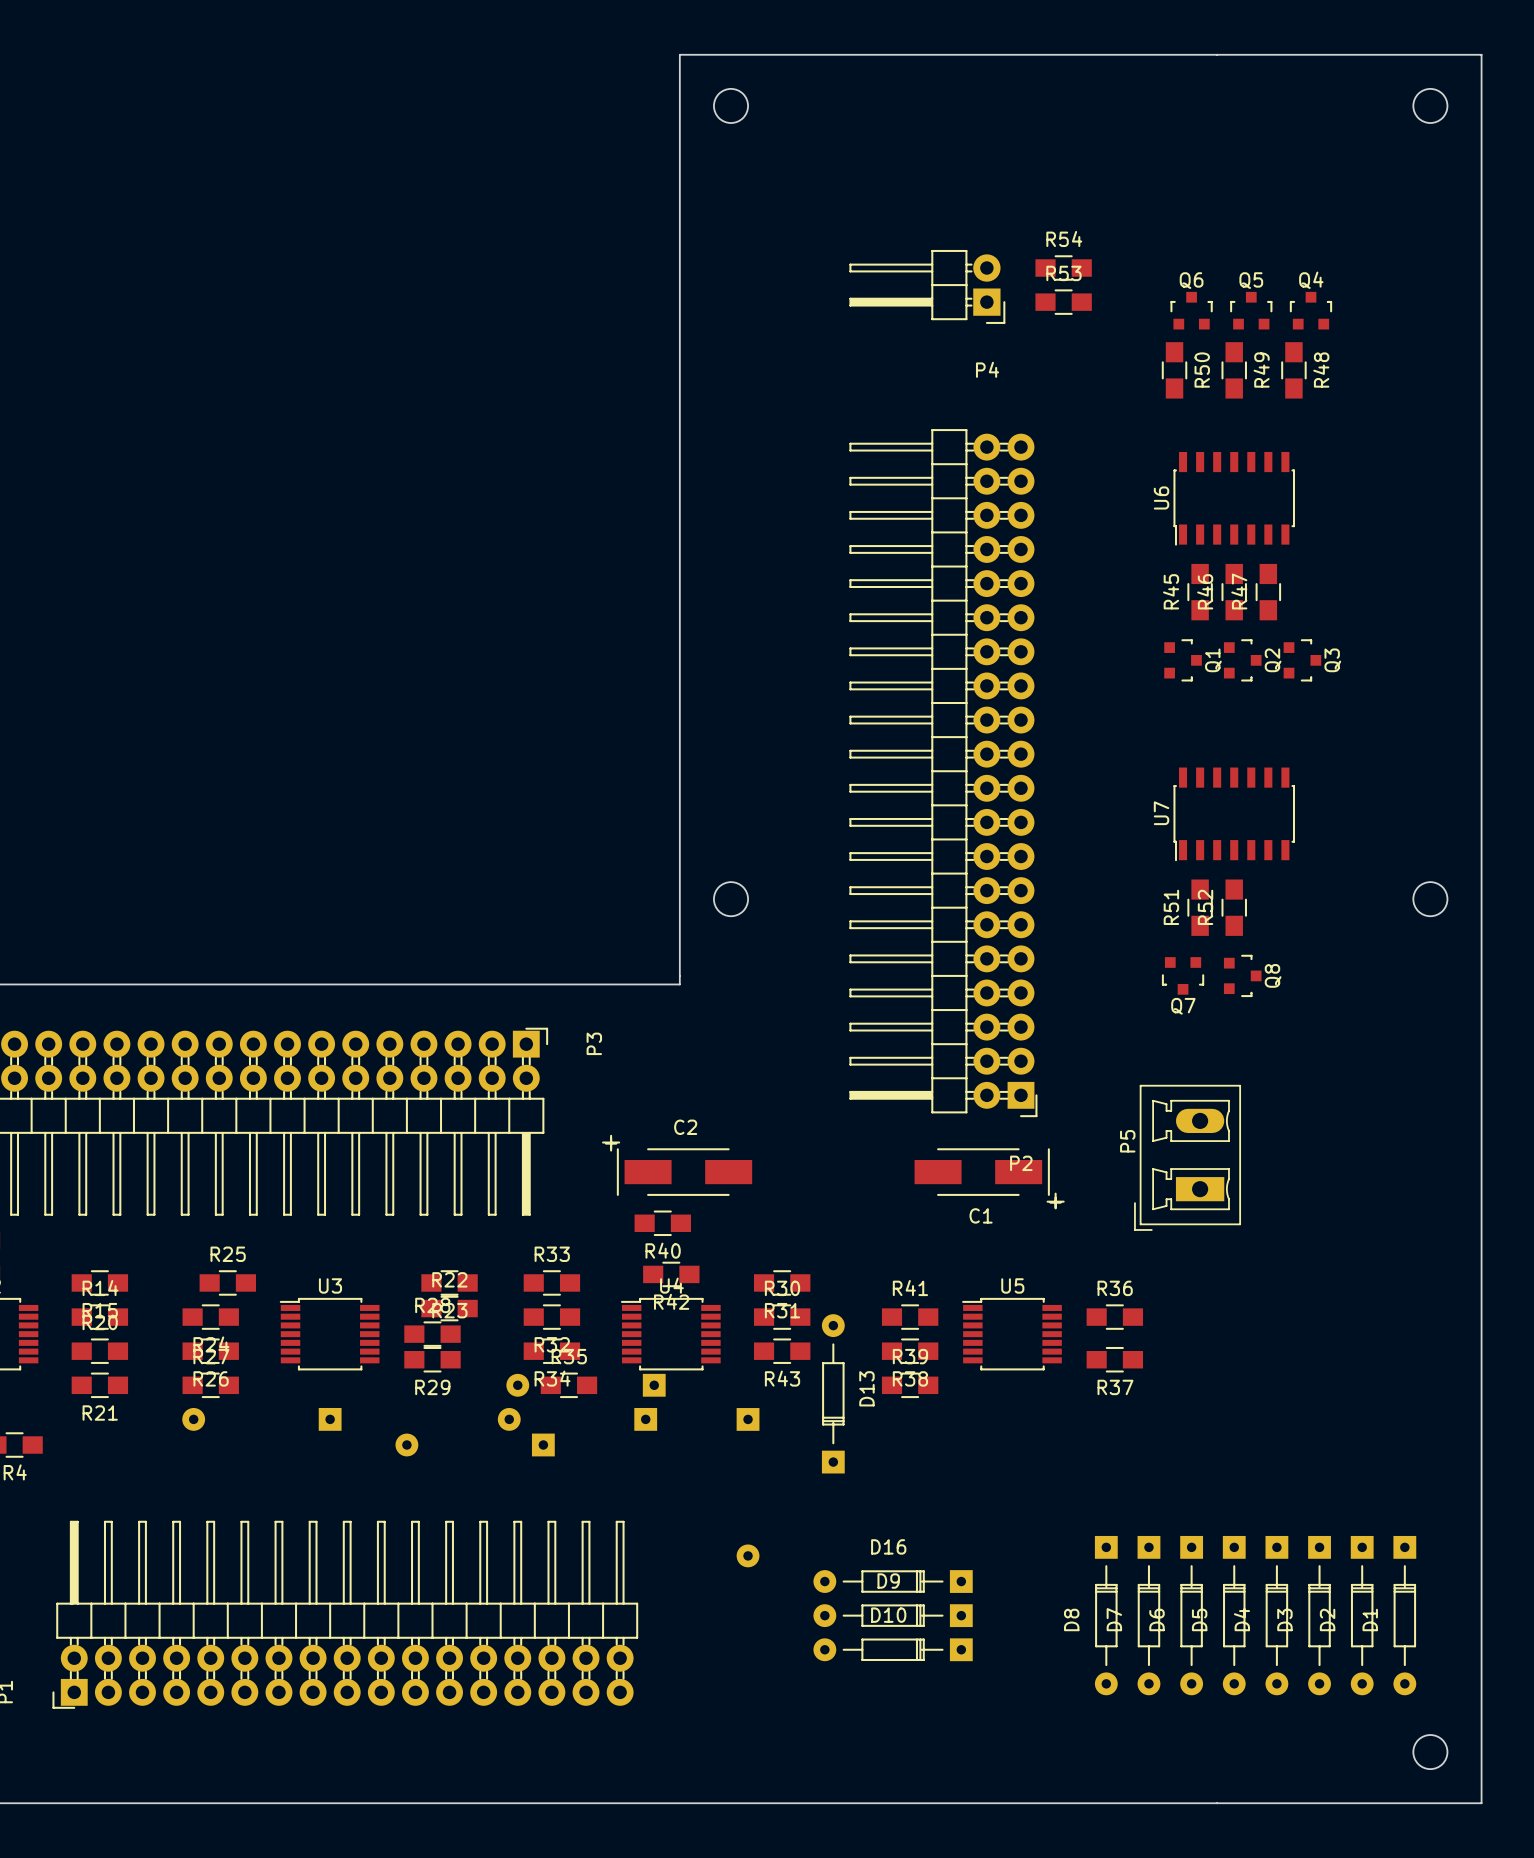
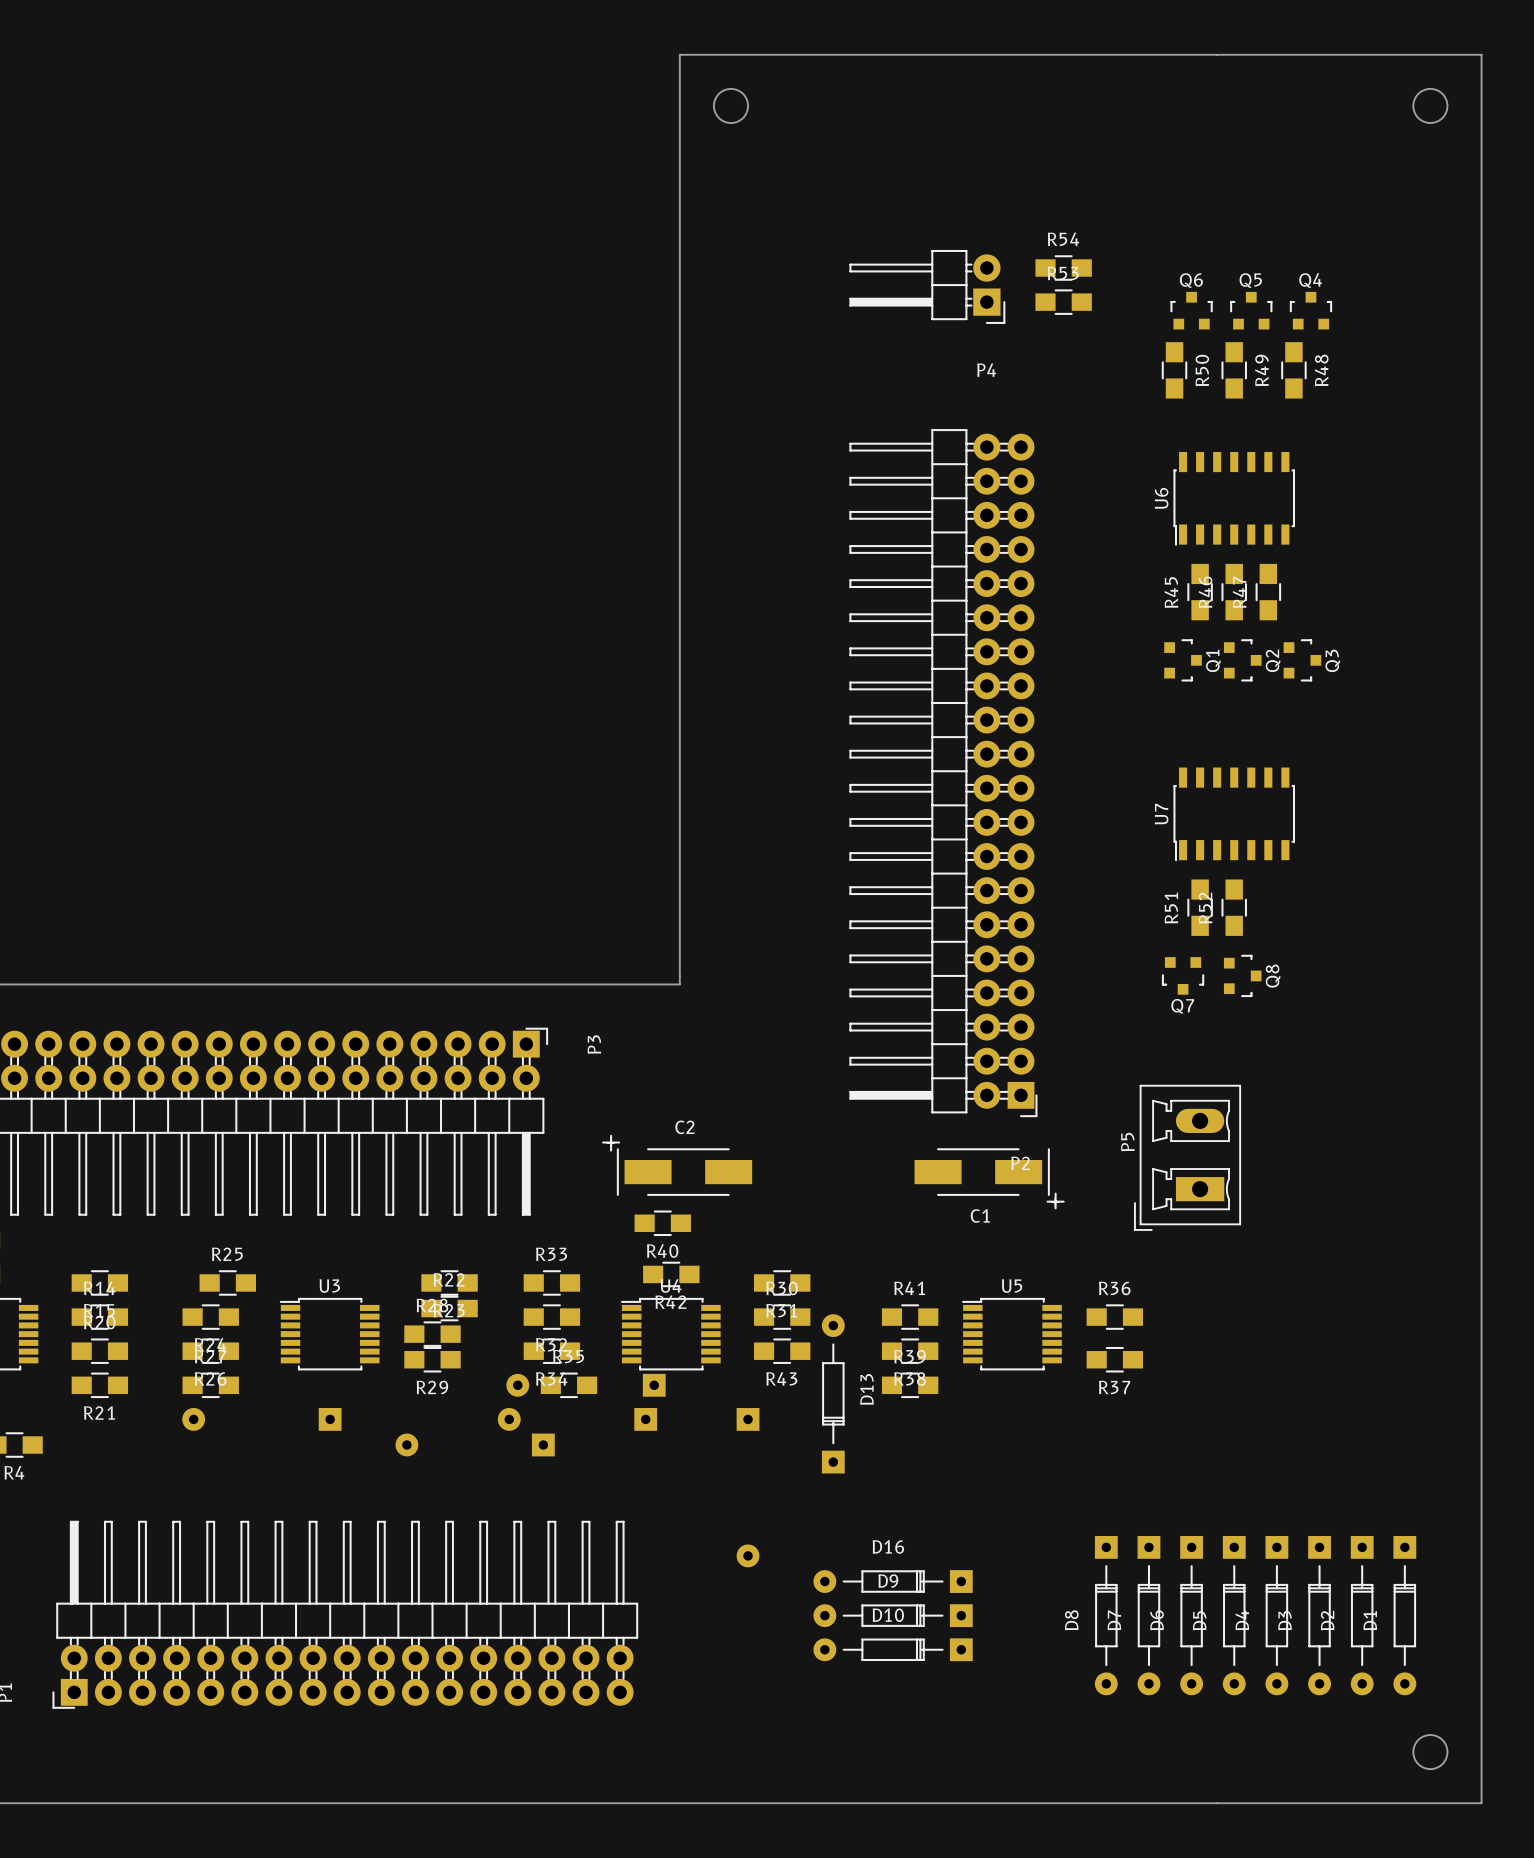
round board edge: [713, 881, 749, 917] -> none
round board edge: [1412, 881, 1449, 917] -> none

